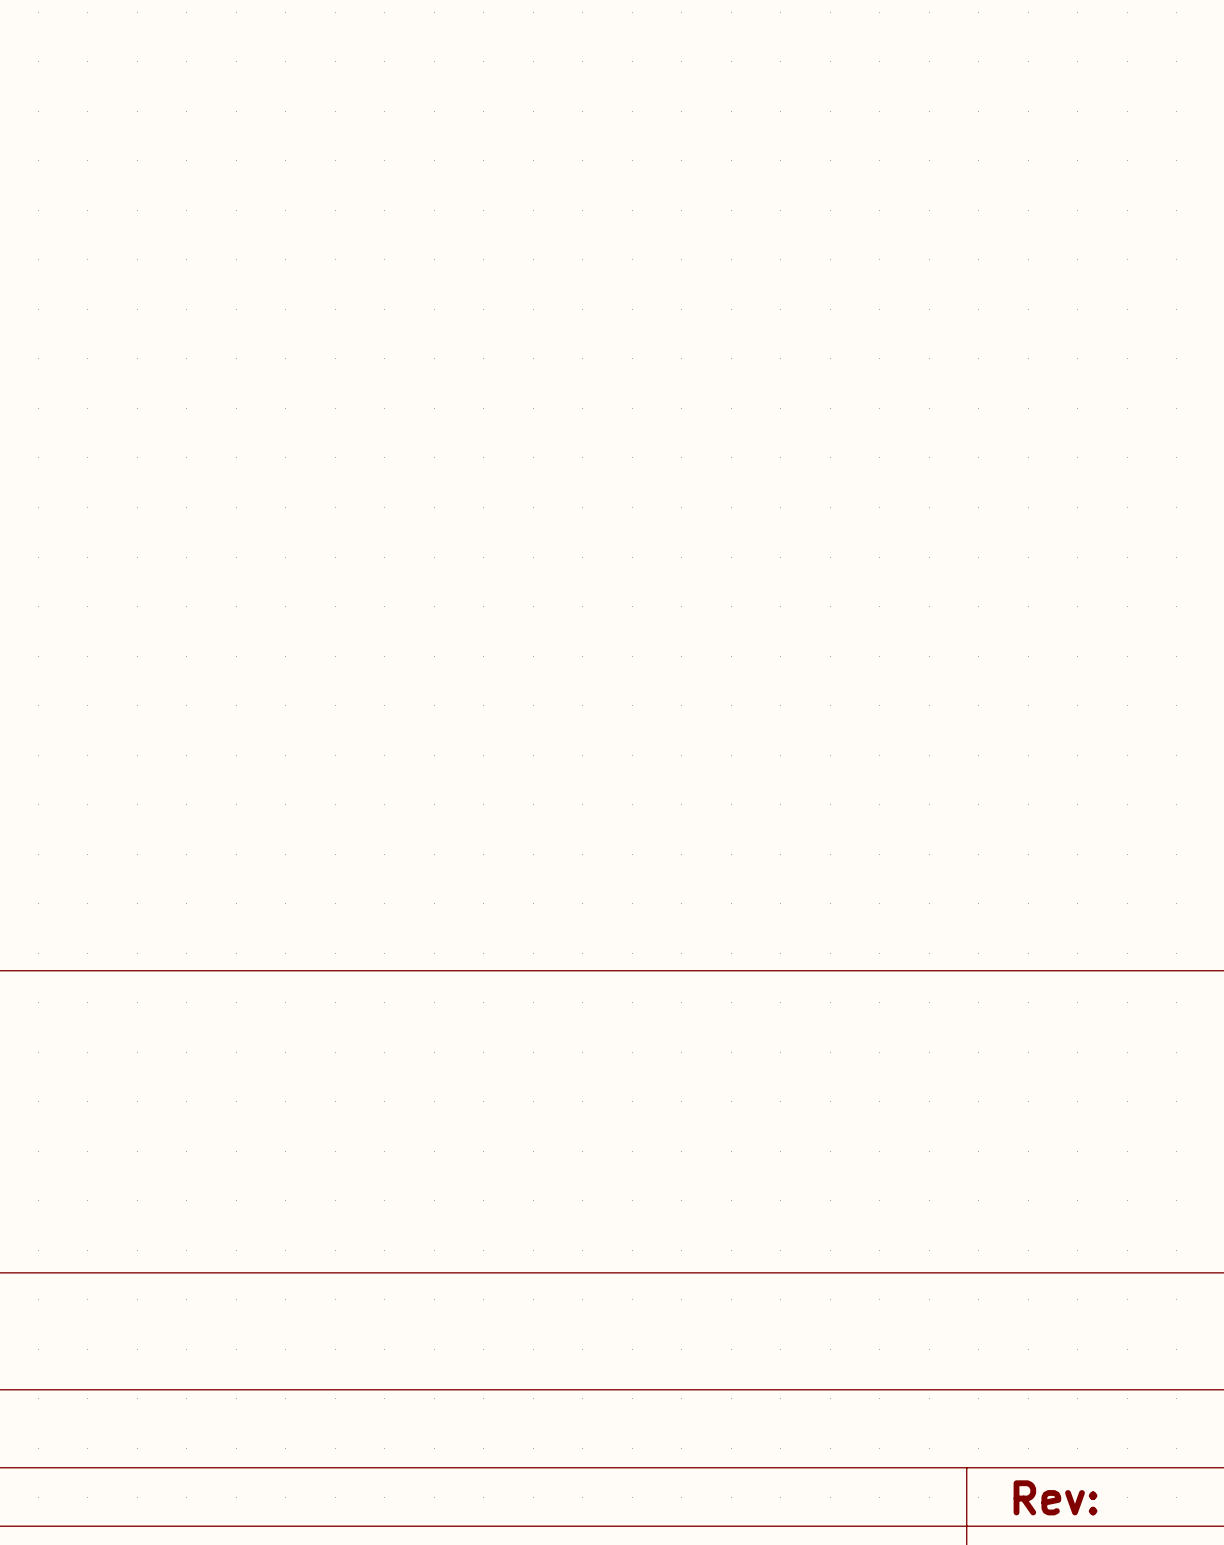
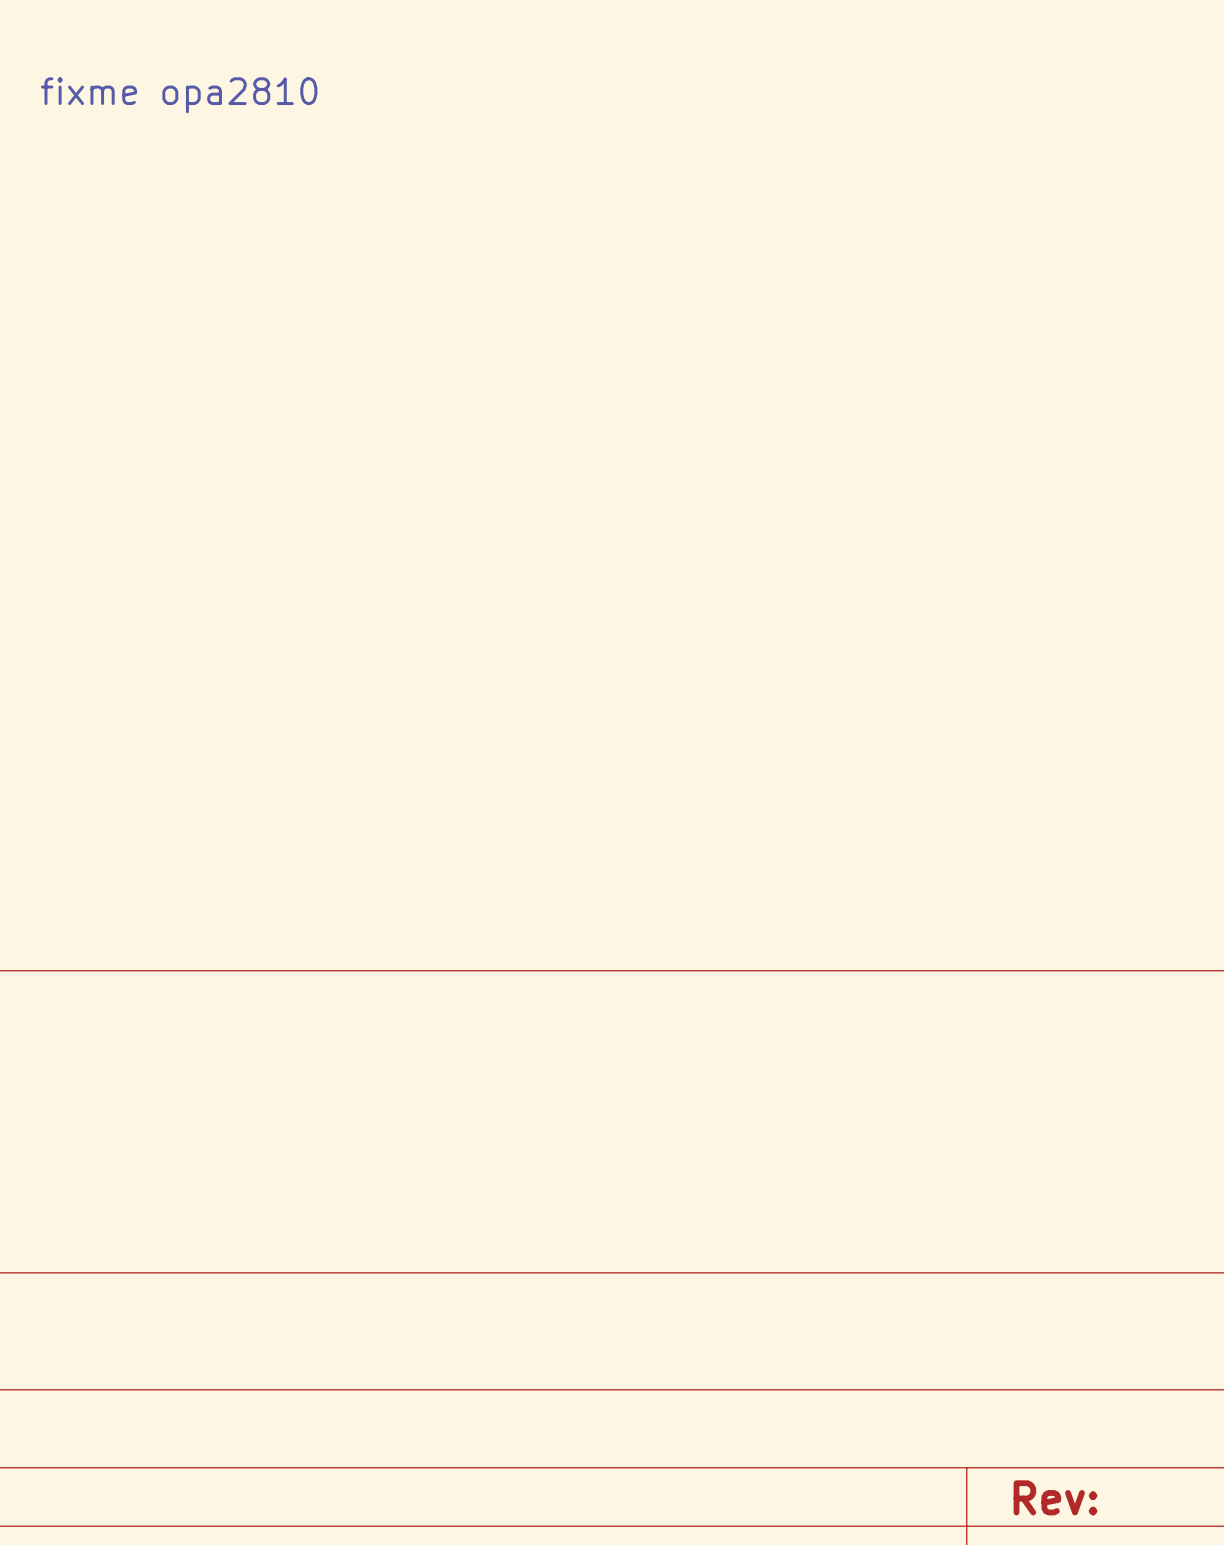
text: none -> fixme opa2810 (179, 95)

